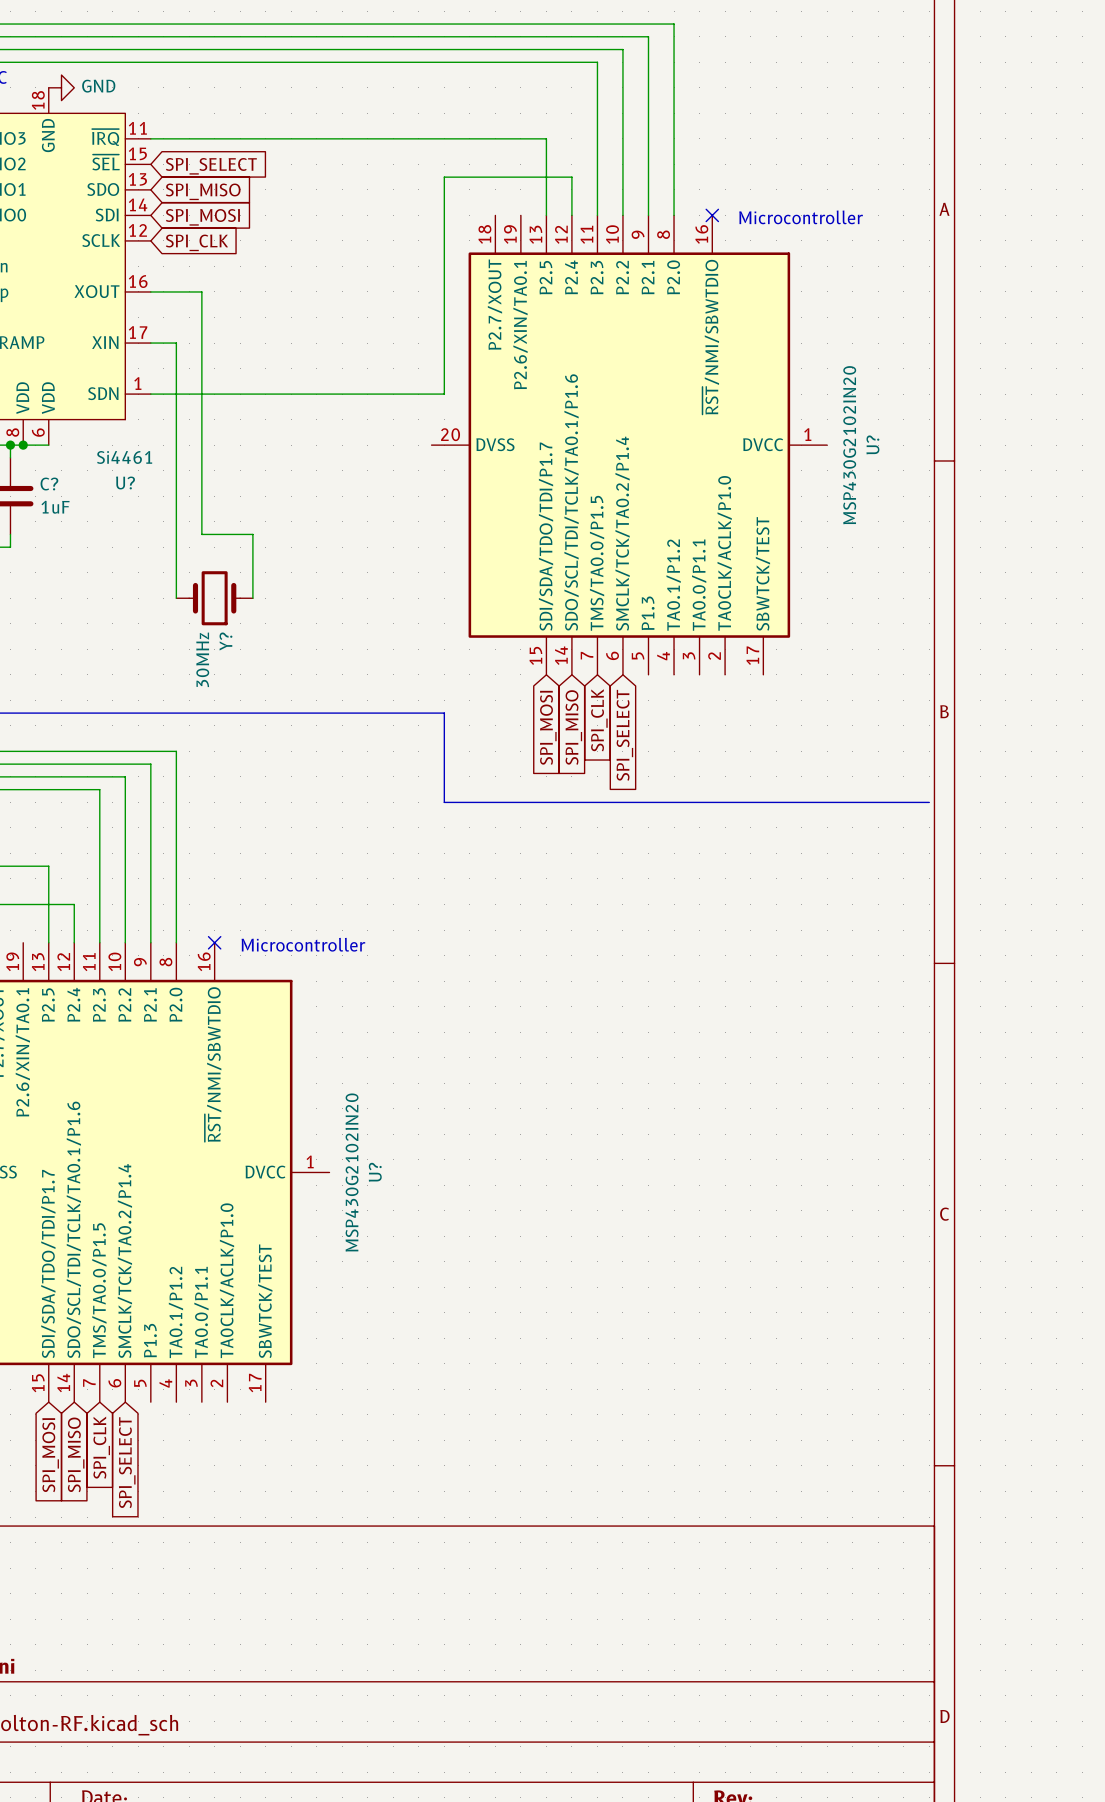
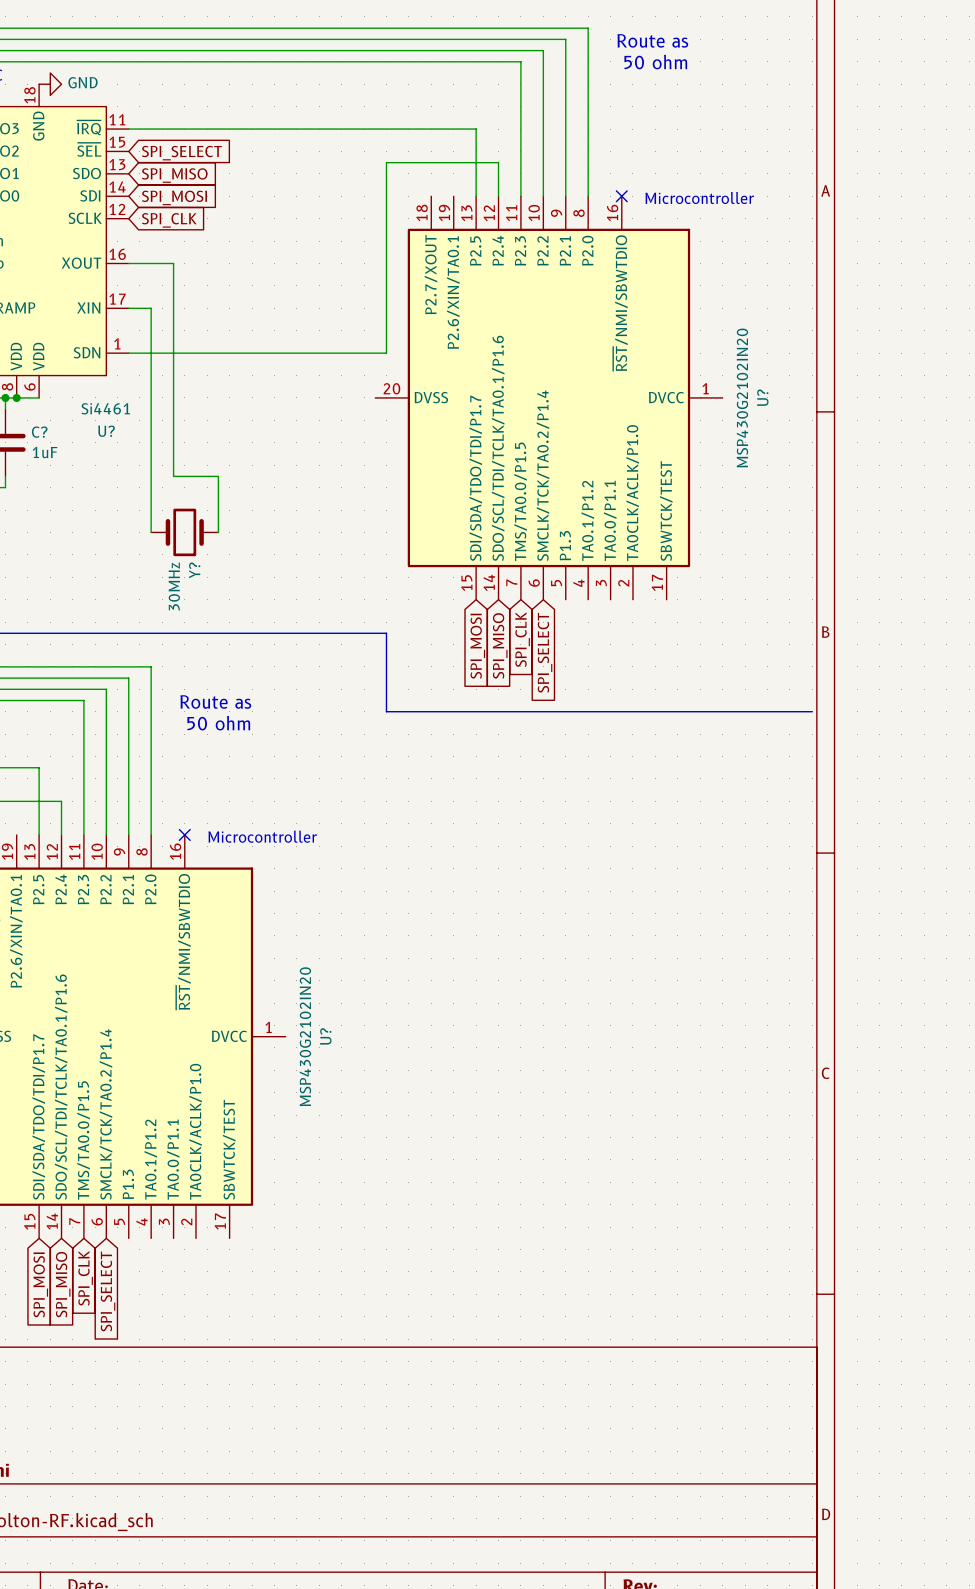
text: none -> Route as (652, 40)
text: none -> 50 ohm (655, 62)
text: none -> Route as (215, 702)
text: none -> 50 ohm (218, 723)

